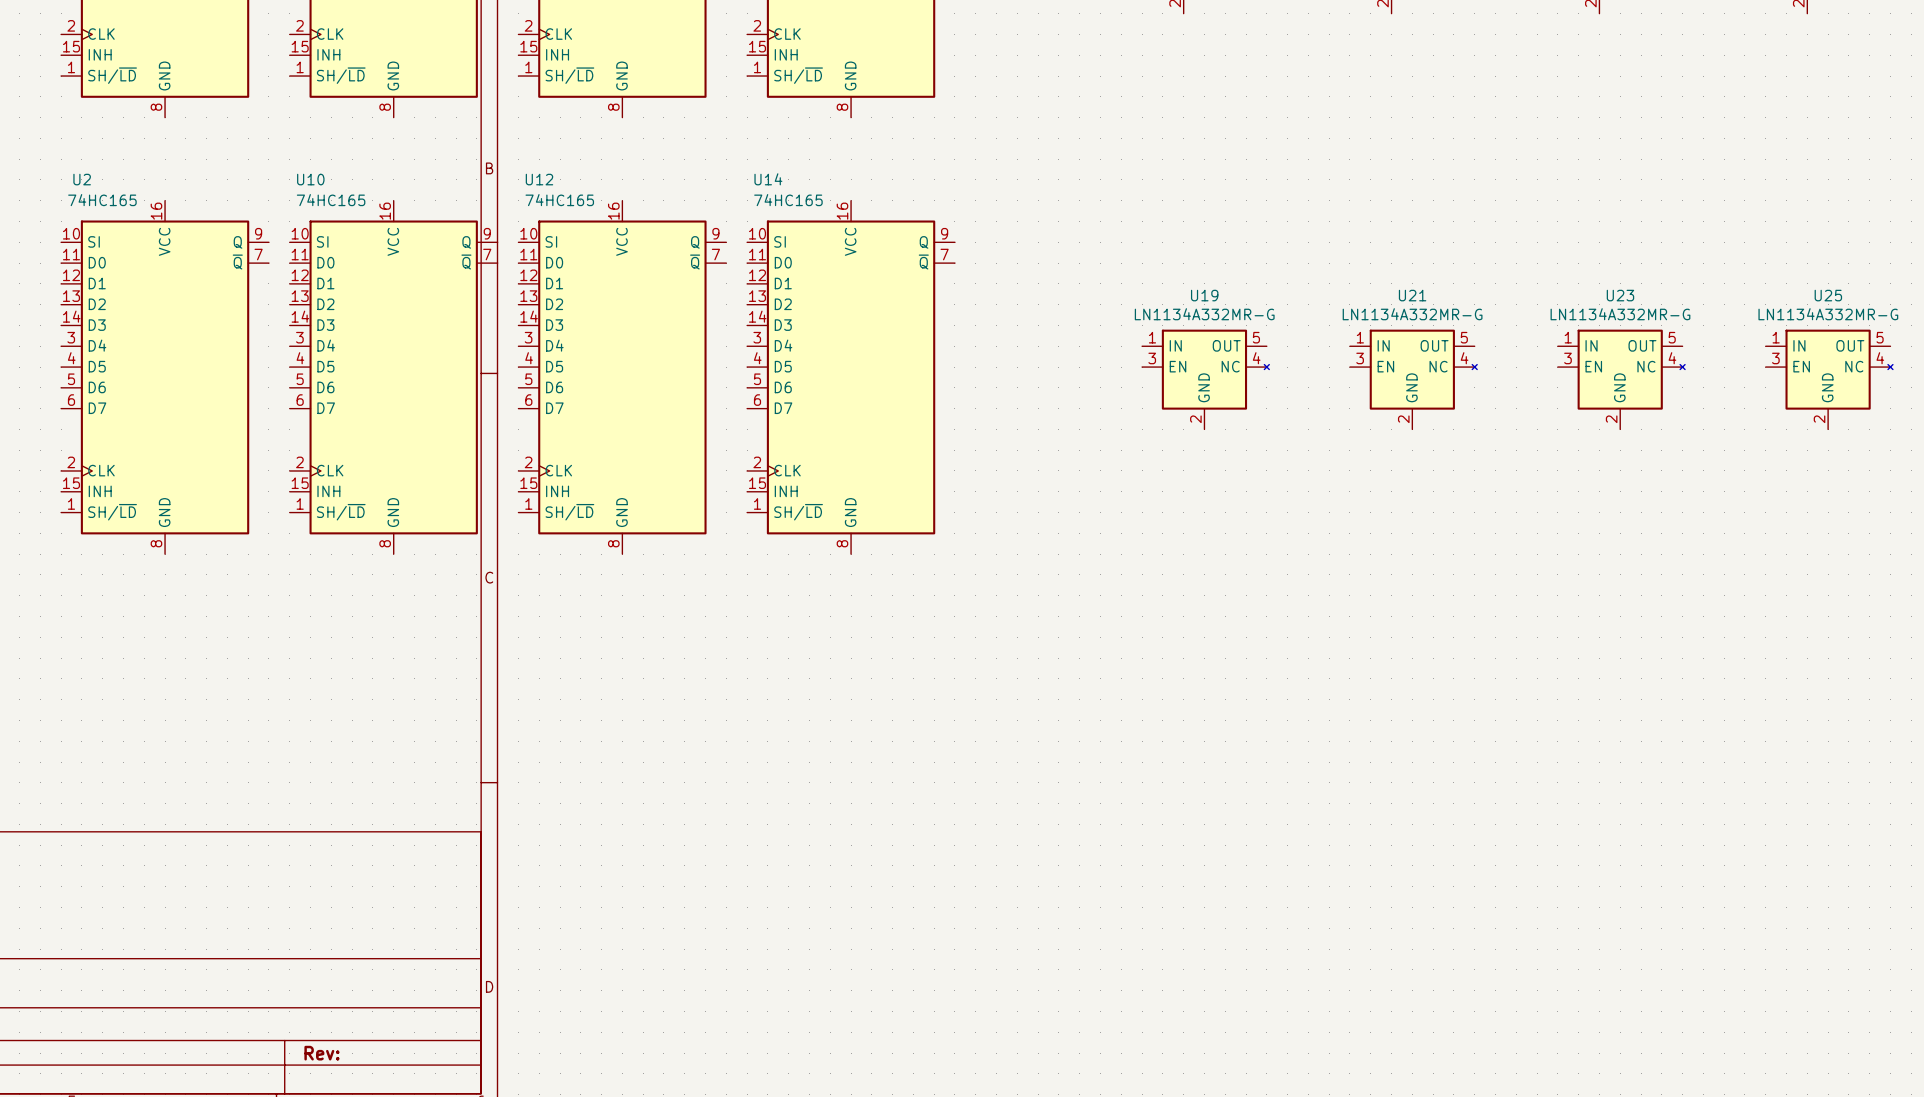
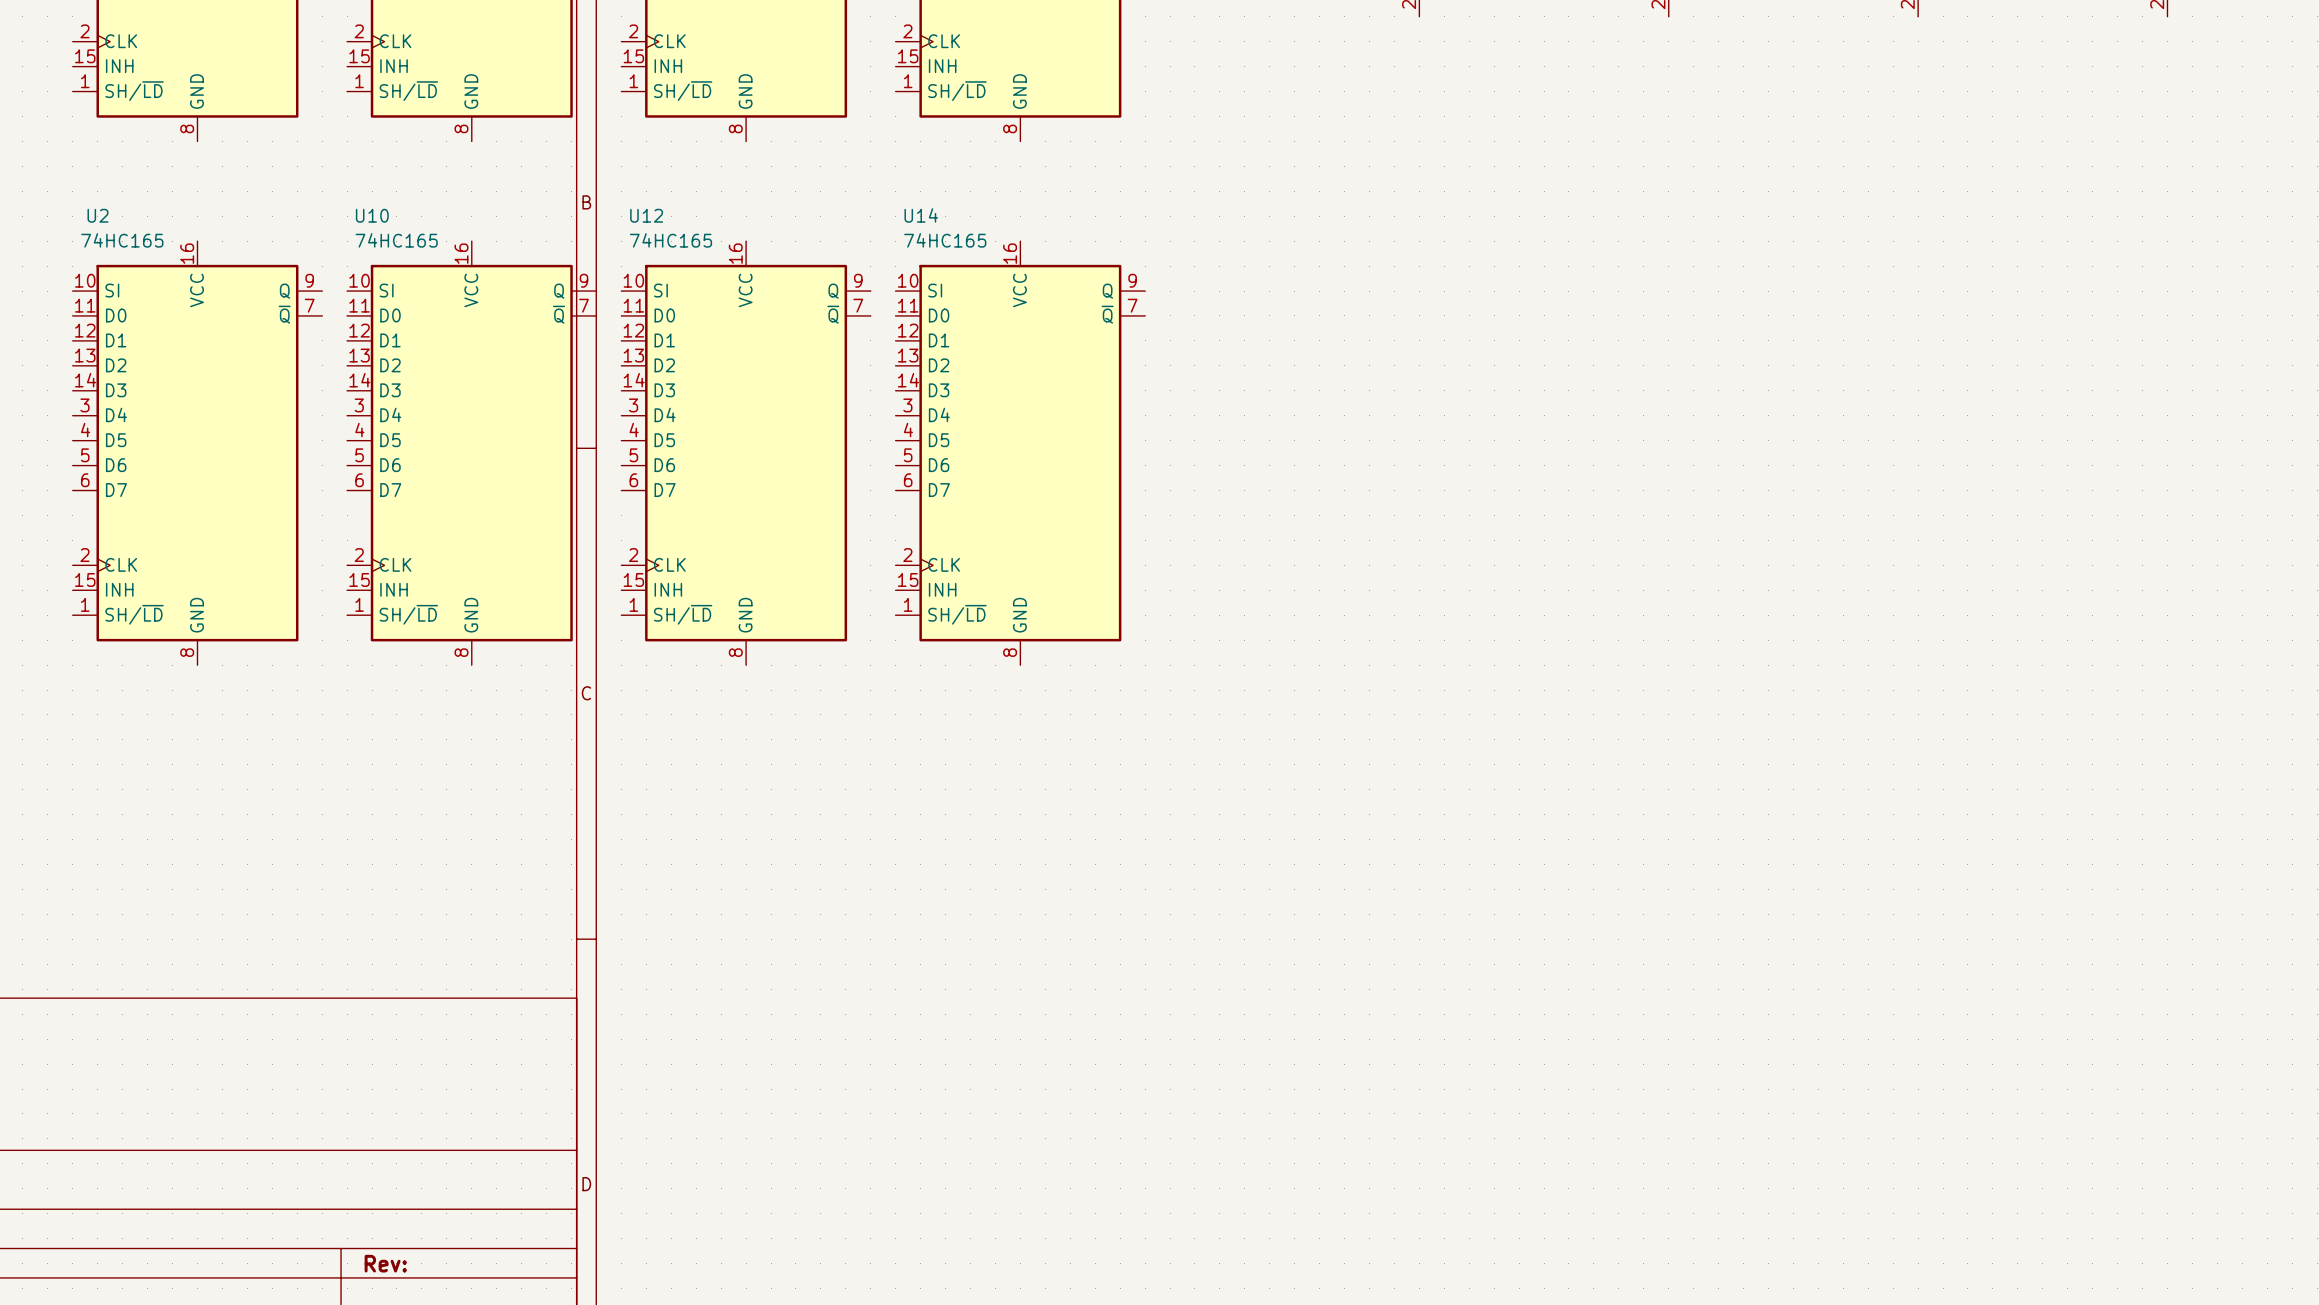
U19: LN1134A332MR-G (1205, 379) -> none
U21: LN1134A332MR-G (1413, 379) -> none
U23: LN1134A332MR-G (1621, 379) -> none
U25: LN1134A332MR-G (1829, 379) -> none

